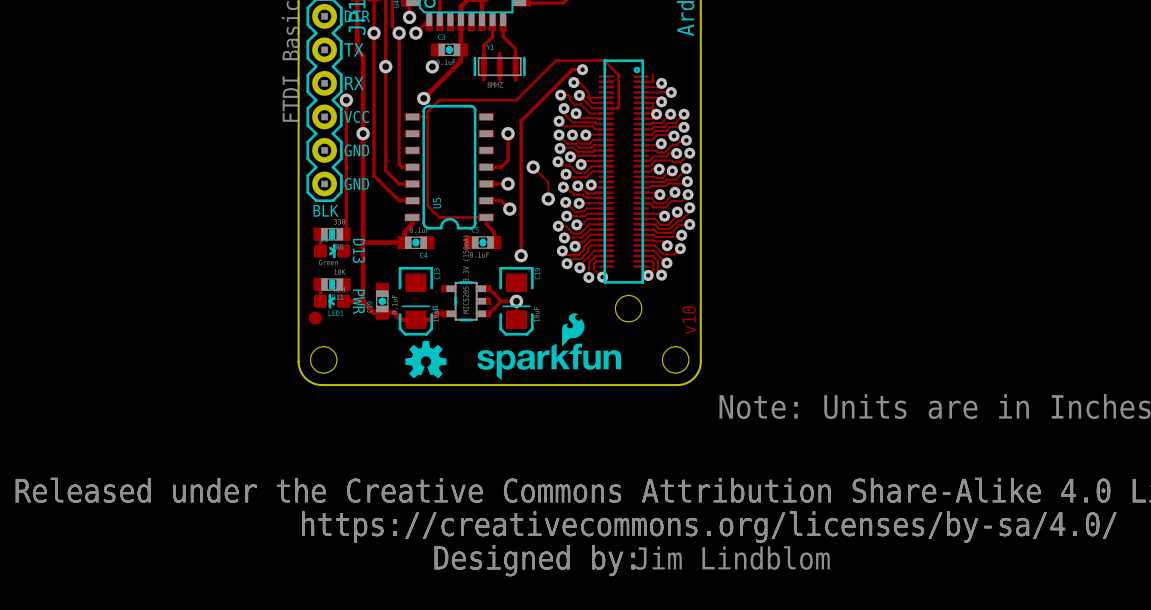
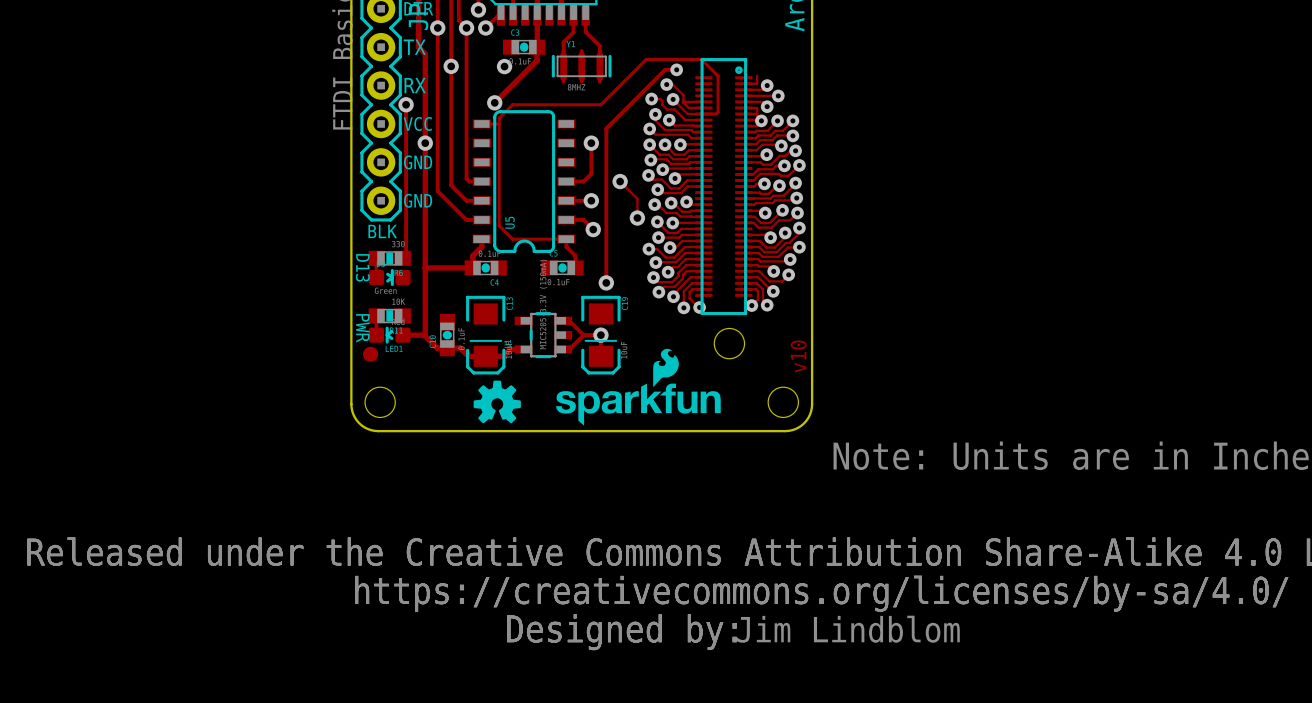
text position: D13 (358, 250) -> D13 (362, 267)
text position: PWR (358, 301) -> PWR (362, 328)

